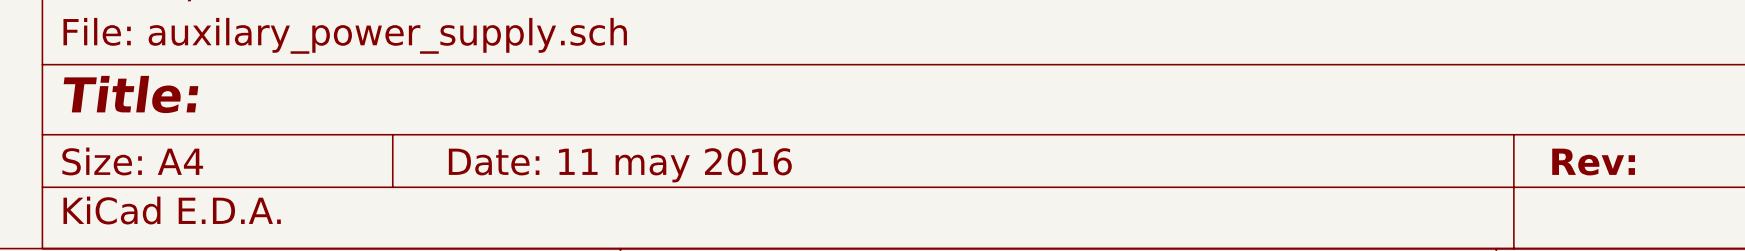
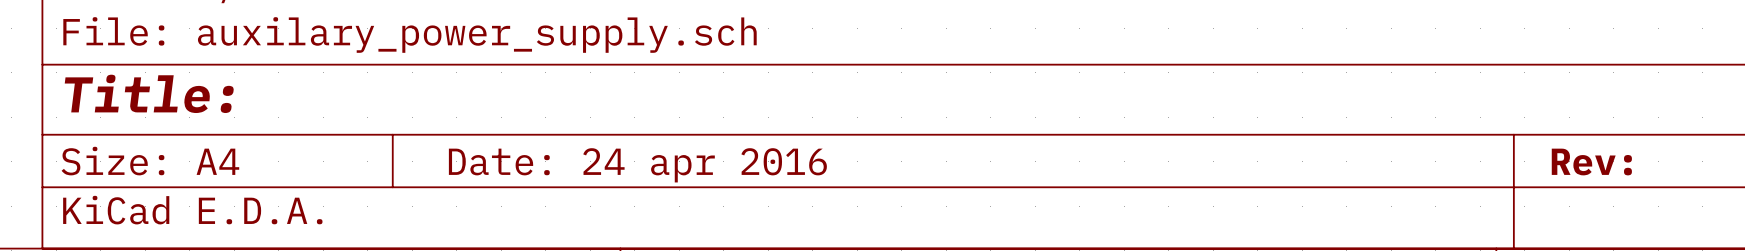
title block: Date: 11 may 2016 (620, 165) -> Date: 24 apr 2016 (637, 165)

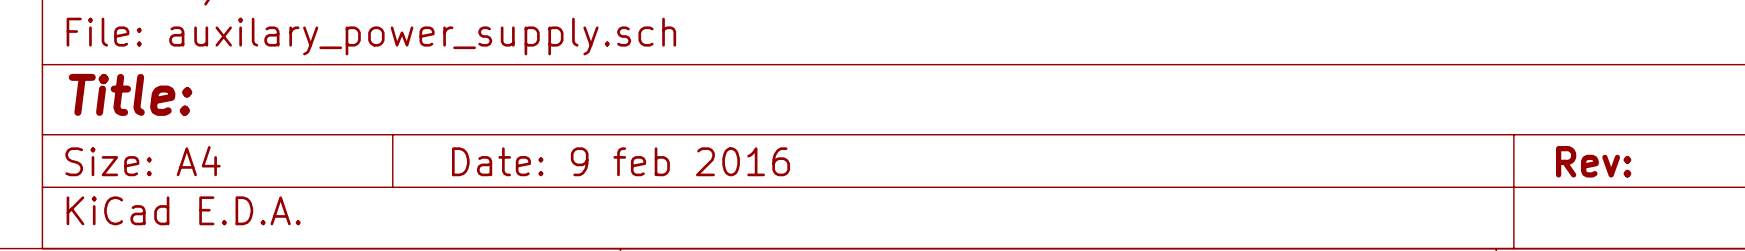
title block: Date: 24 apr 2016 (637, 165) -> Date: 9 feb 2016 (620, 161)

